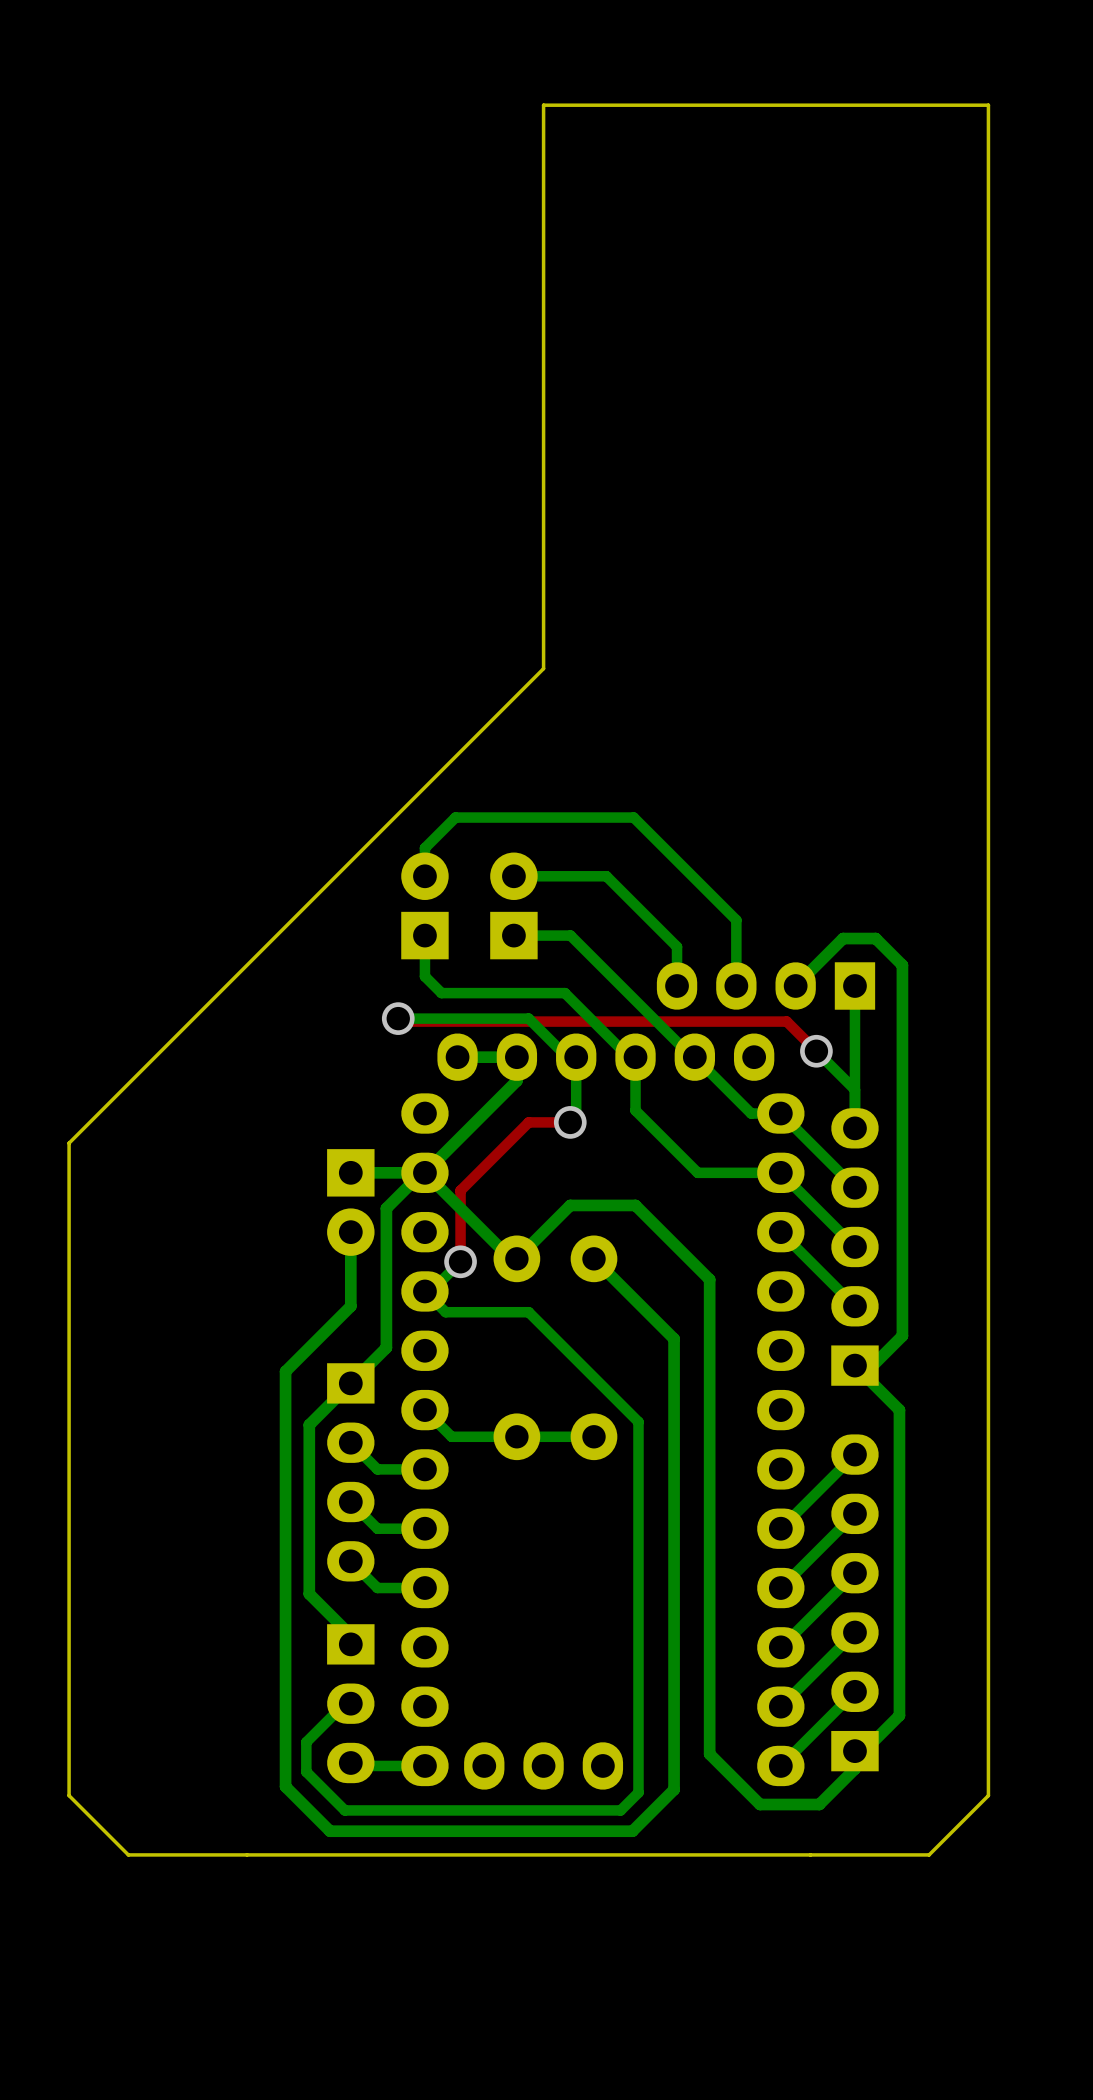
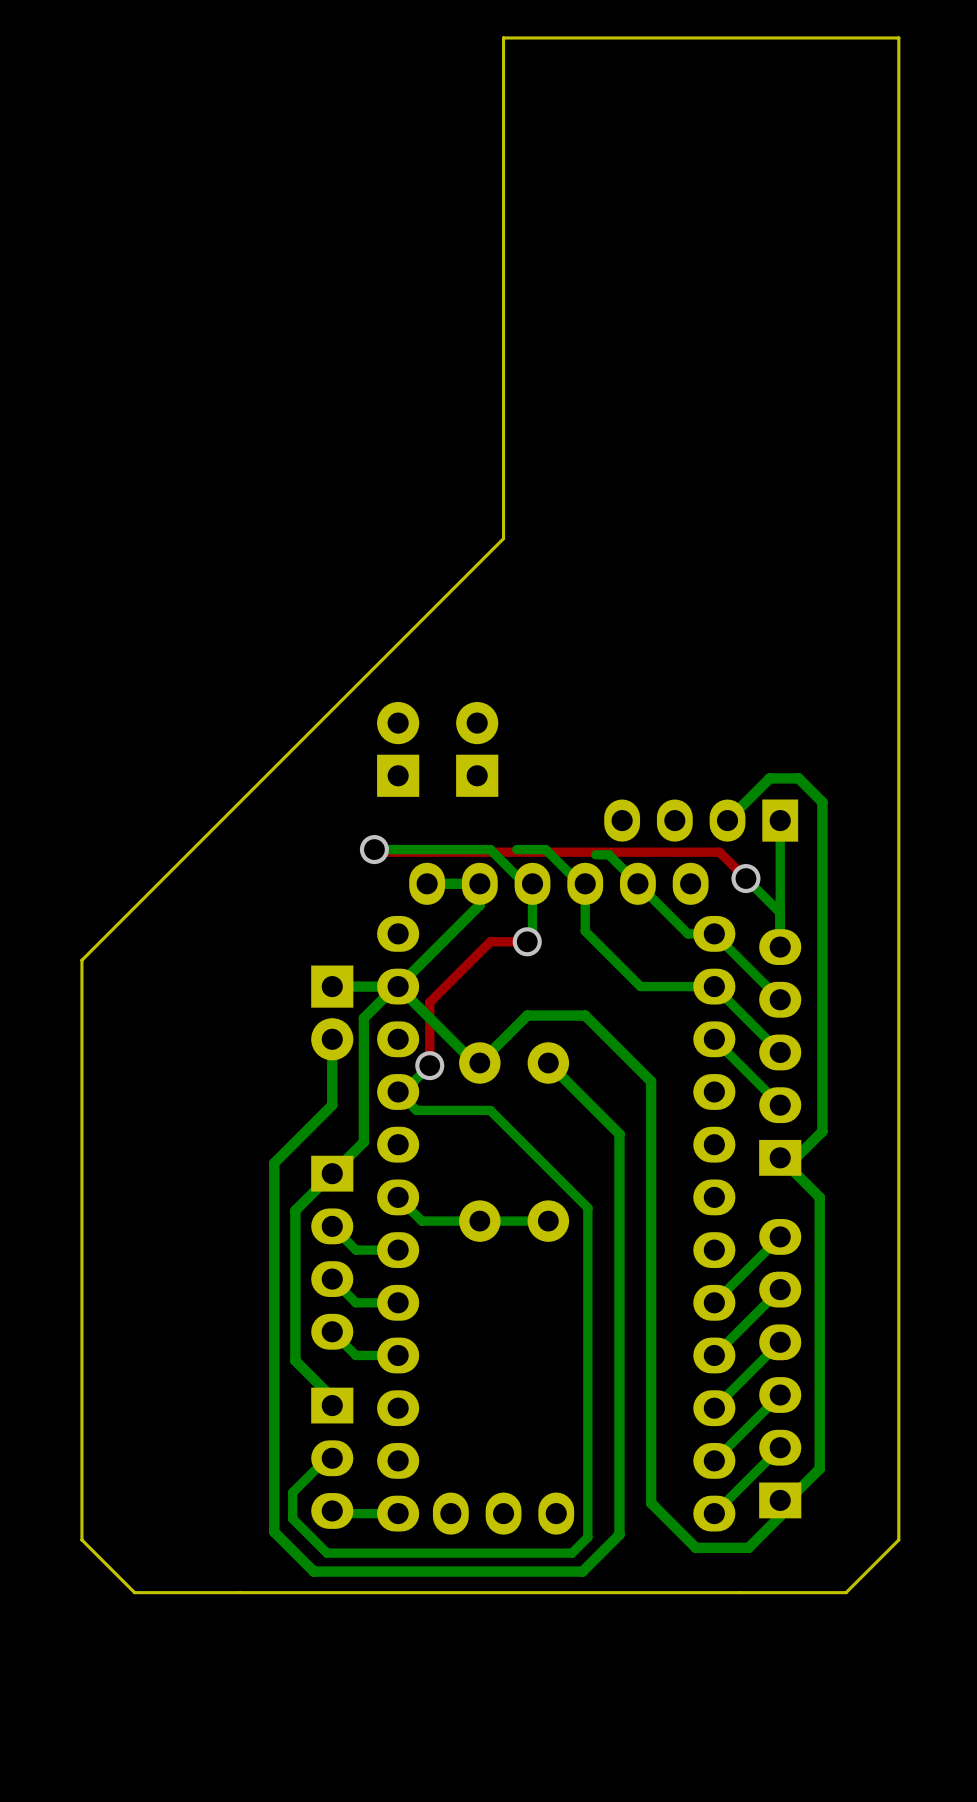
bottom track: (424, 876) (424, 848) (455, 817) (633, 817) (736, 920) (736, 985) -> none
bottom track: (513, 876) (606, 876) (677, 946) (677, 985) -> none
bottom track: (424, 935) (424, 976) (441, 993) (564, 993) (629, 1057) -> (516, 849) (545, 849) (579, 883)
bottom track: (513, 935) (570, 935) (692, 1057) (694, 1057) -> (595, 854) (608, 854) (637, 883)

